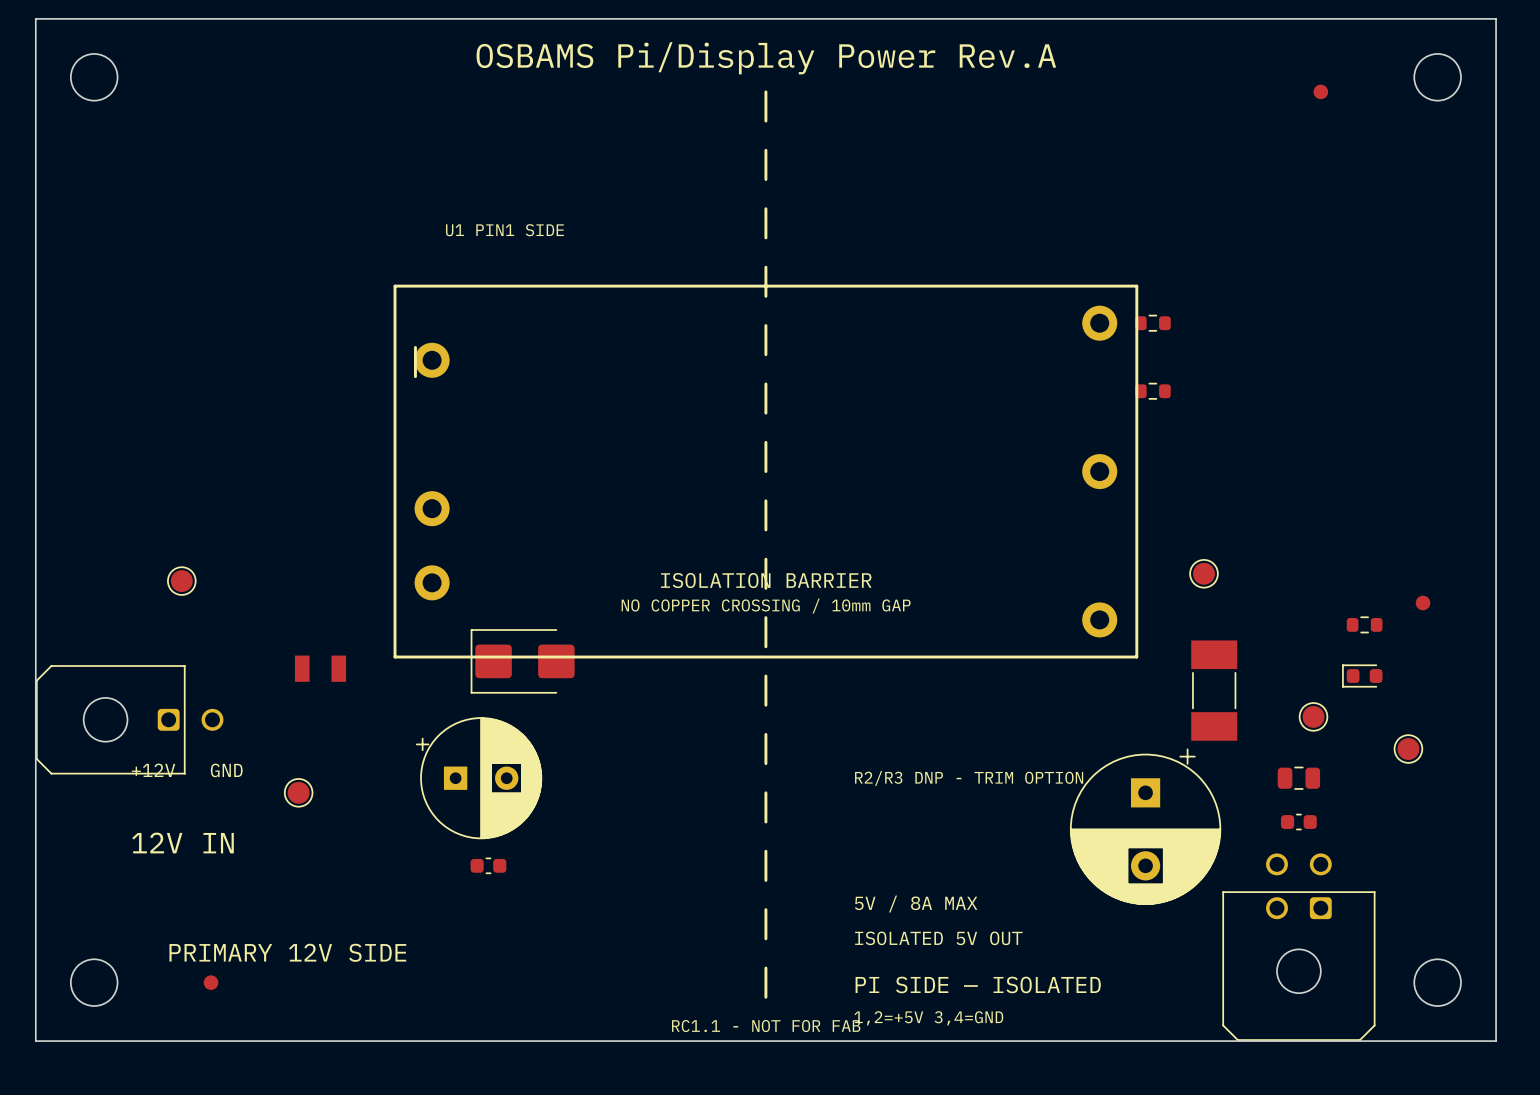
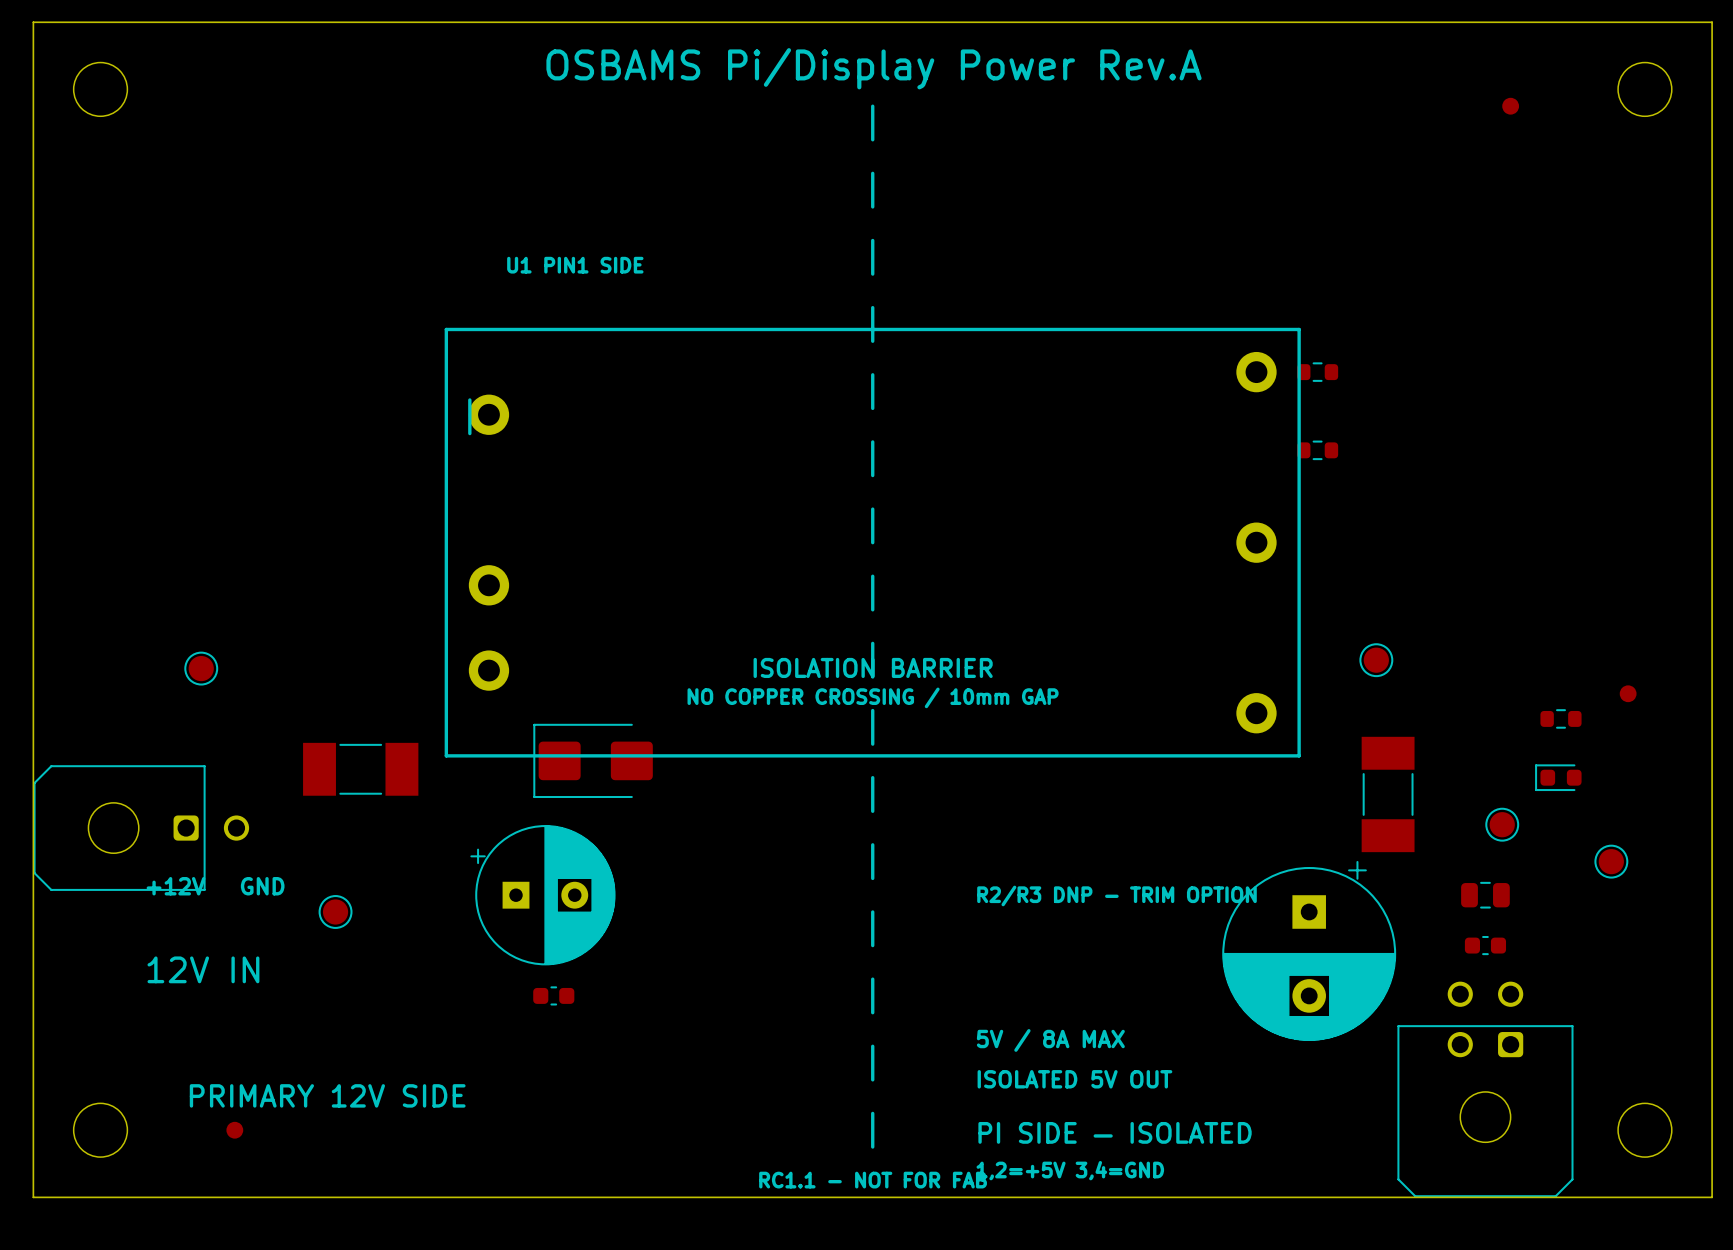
part footprint: [294, 655, 347, 682] -> [303, 742, 419, 796]

